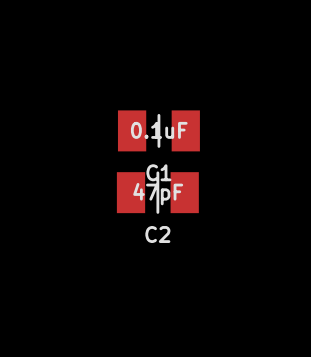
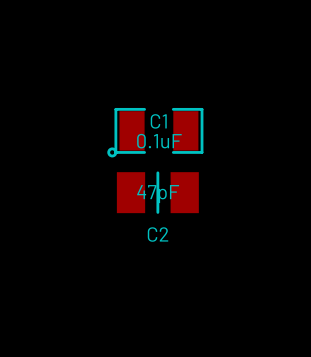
C1 footprint: [117, 110, 200, 152] -> [107, 107, 204, 158]

